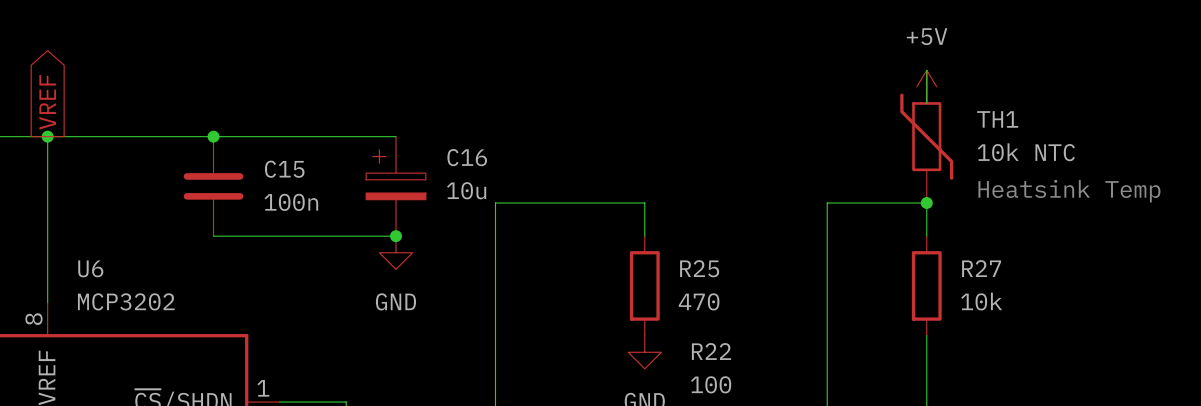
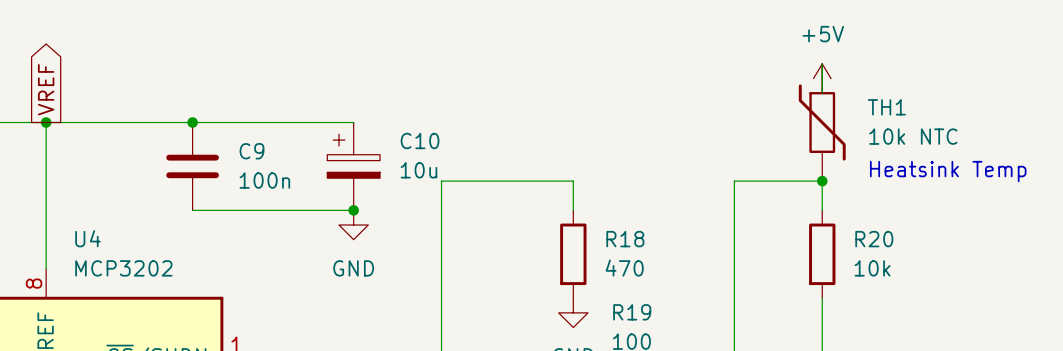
C16 name: C16 (467, 157) -> C10 (420, 141)
C15 name: C15 (284, 169) -> C9 (251, 151)
U6 name: U6 (90, 268) -> U4 (87, 238)
R25 name: R25 (699, 268) -> R18 (625, 239)
R27 name: R27 (981, 268) -> R20 (874, 239)
R22 name: R22 (711, 351) -> R19 (632, 312)

